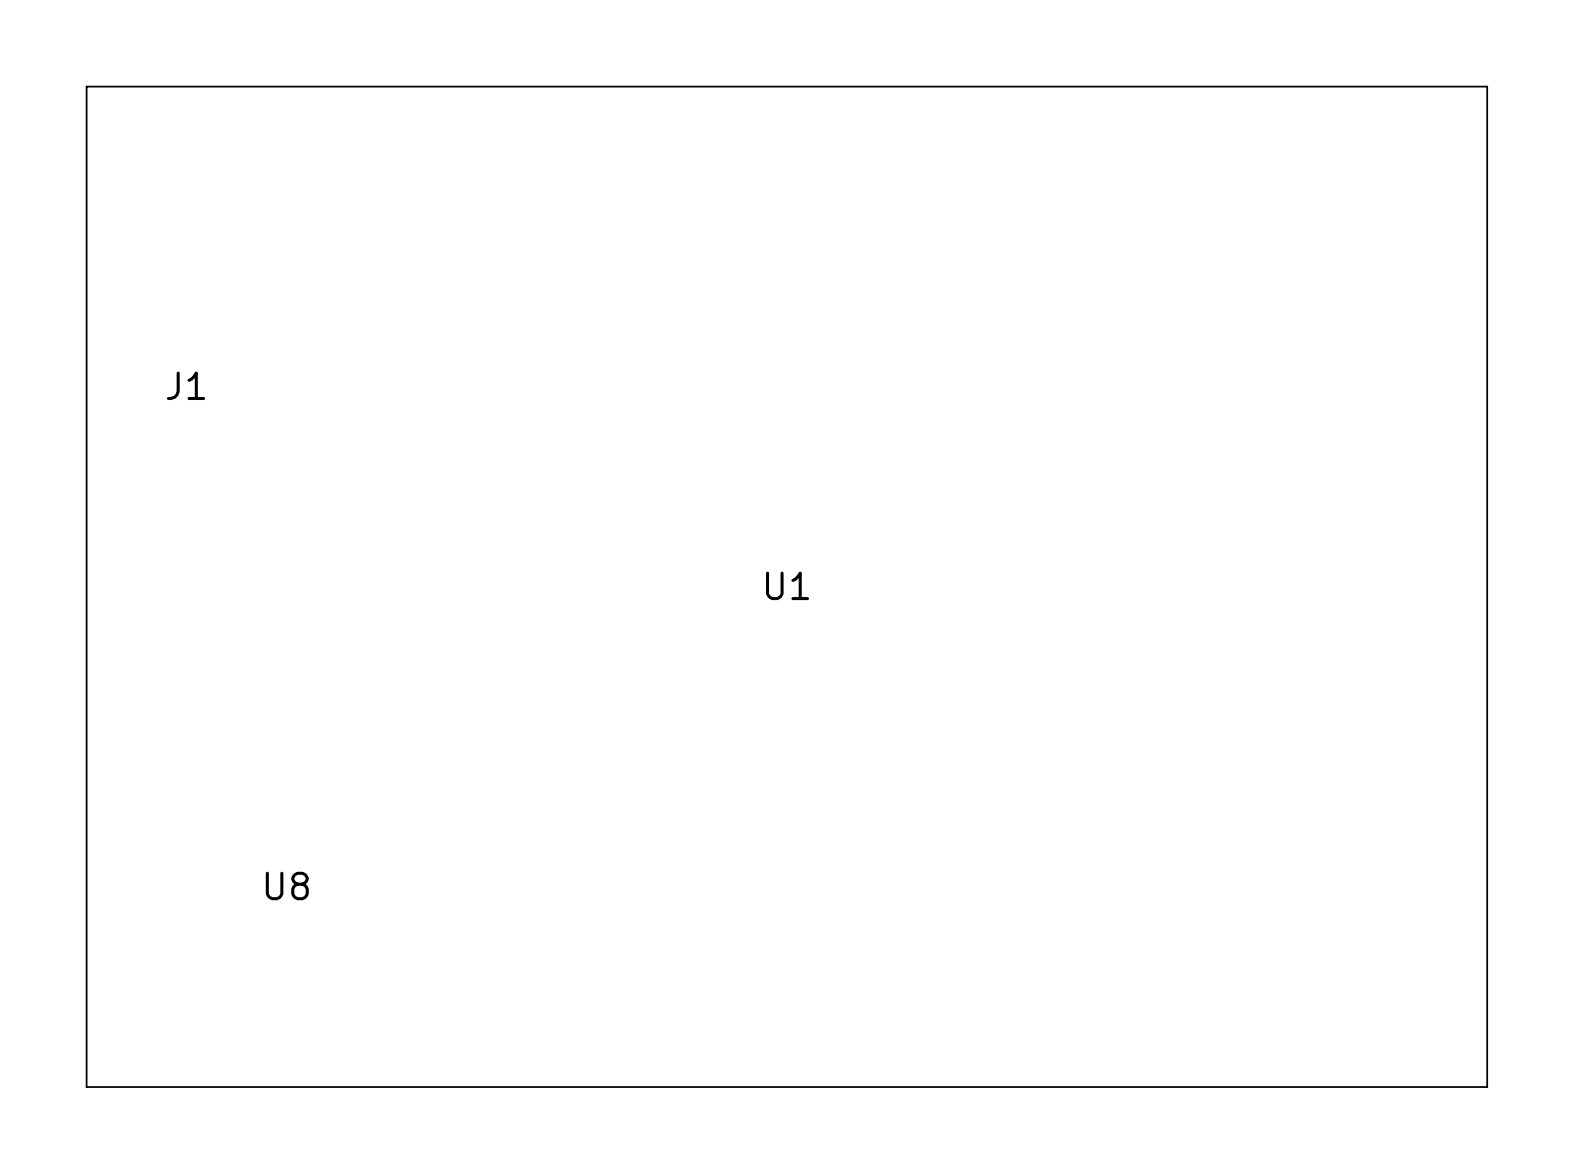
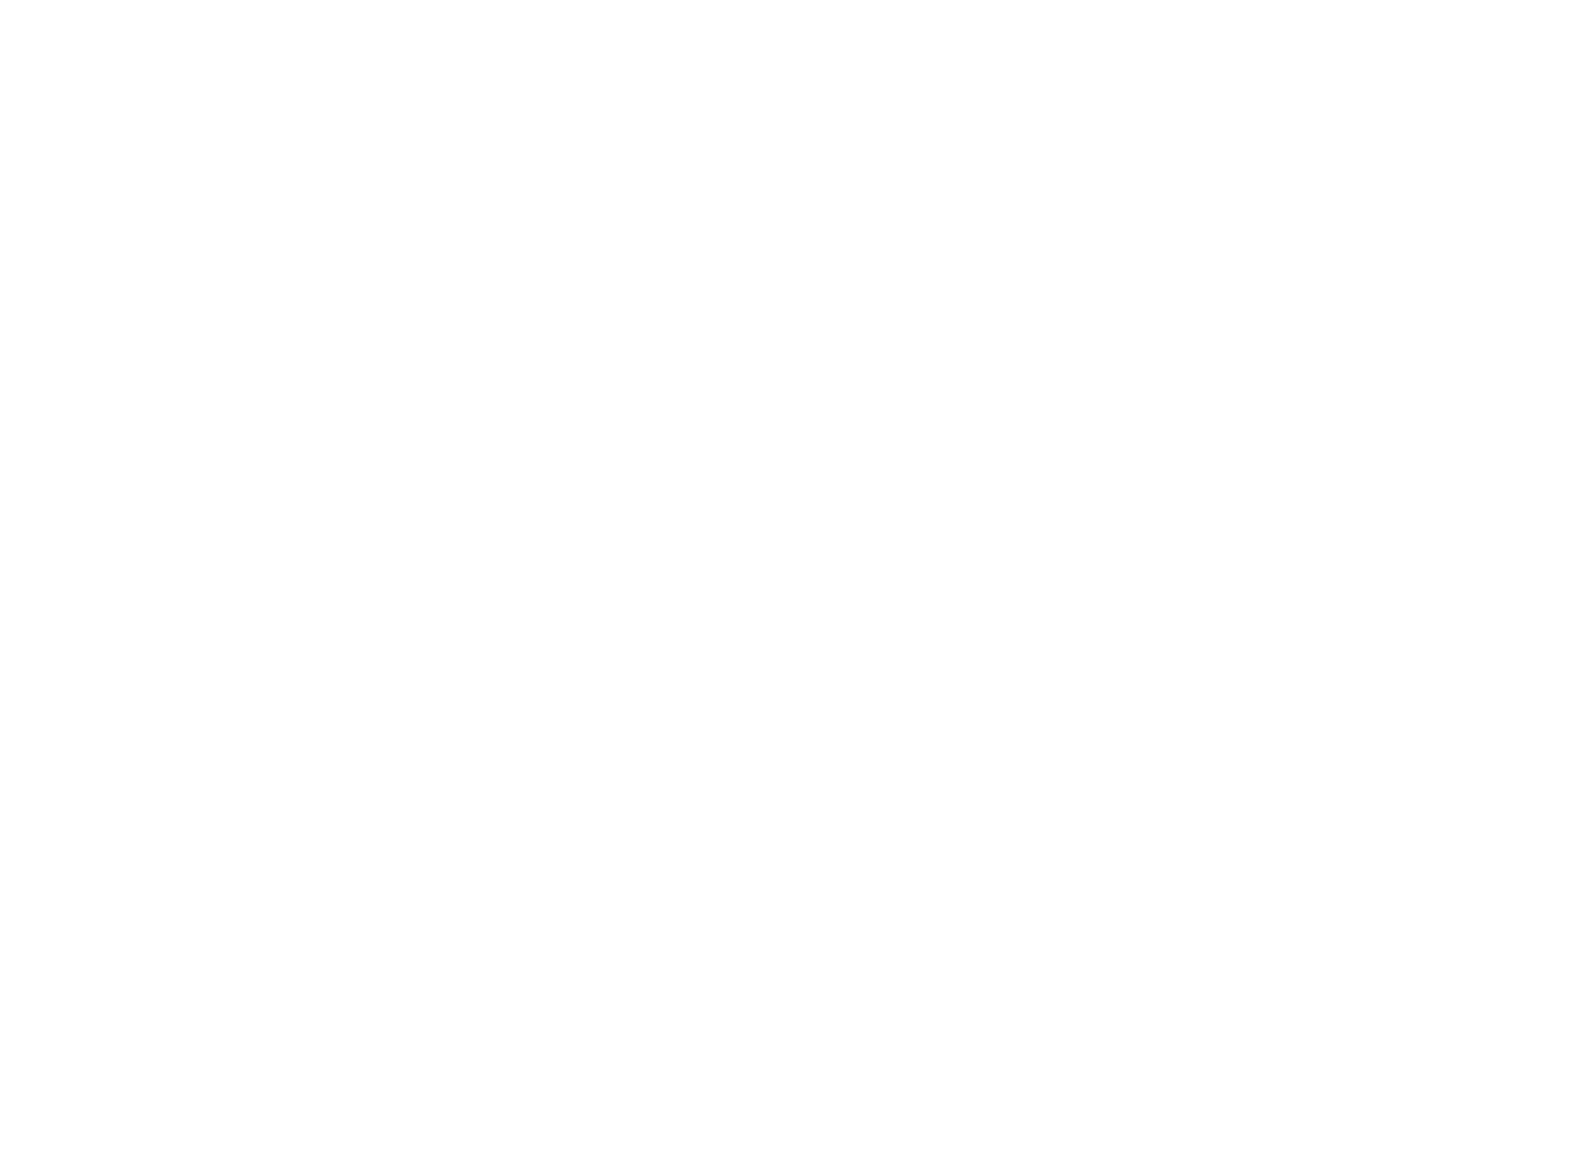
board edge: (86, 86) (1487, 86) (1487, 1087) (86, 1087) (86, 86) -> none
J1: (186, 385) -> none
U1: (787, 585) -> none
U8: (287, 885) -> none

